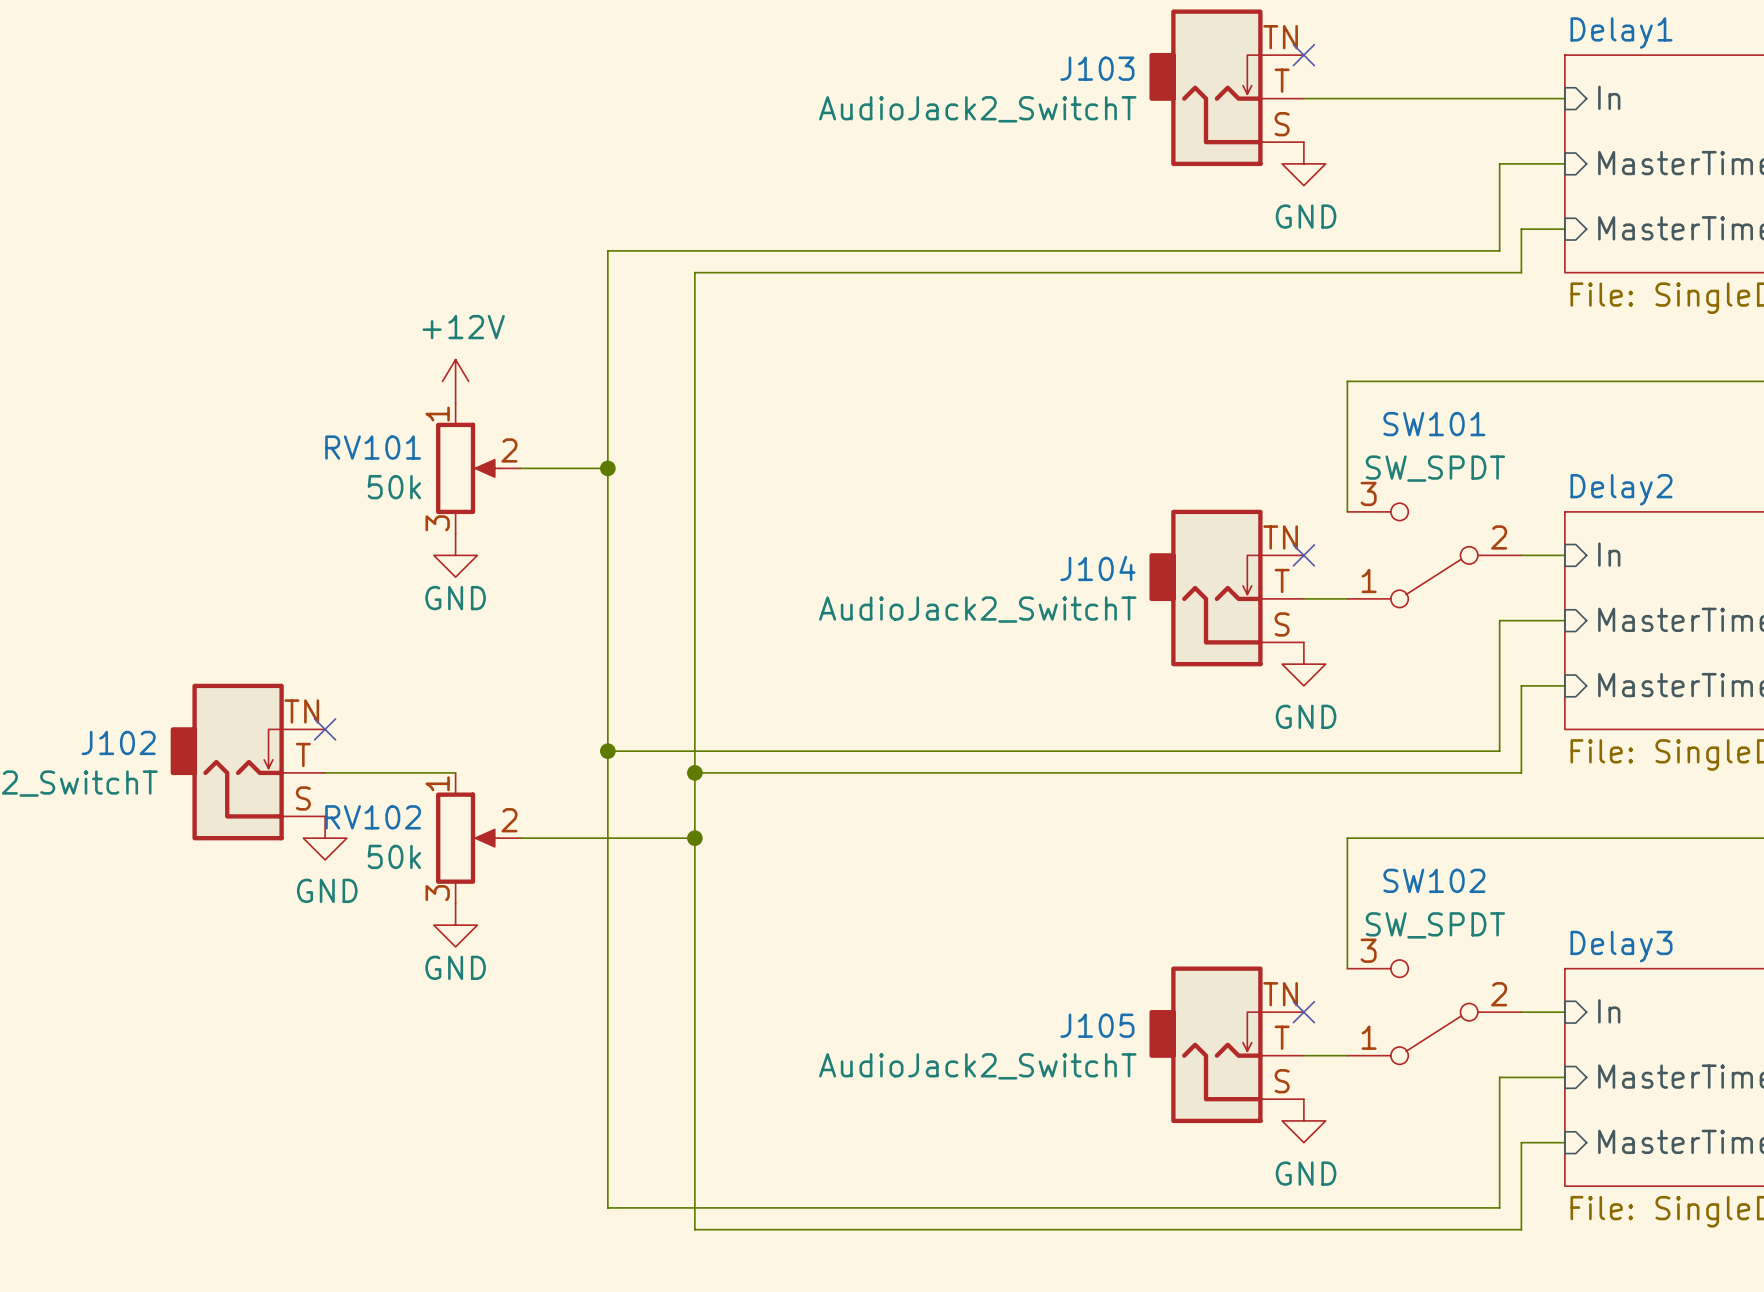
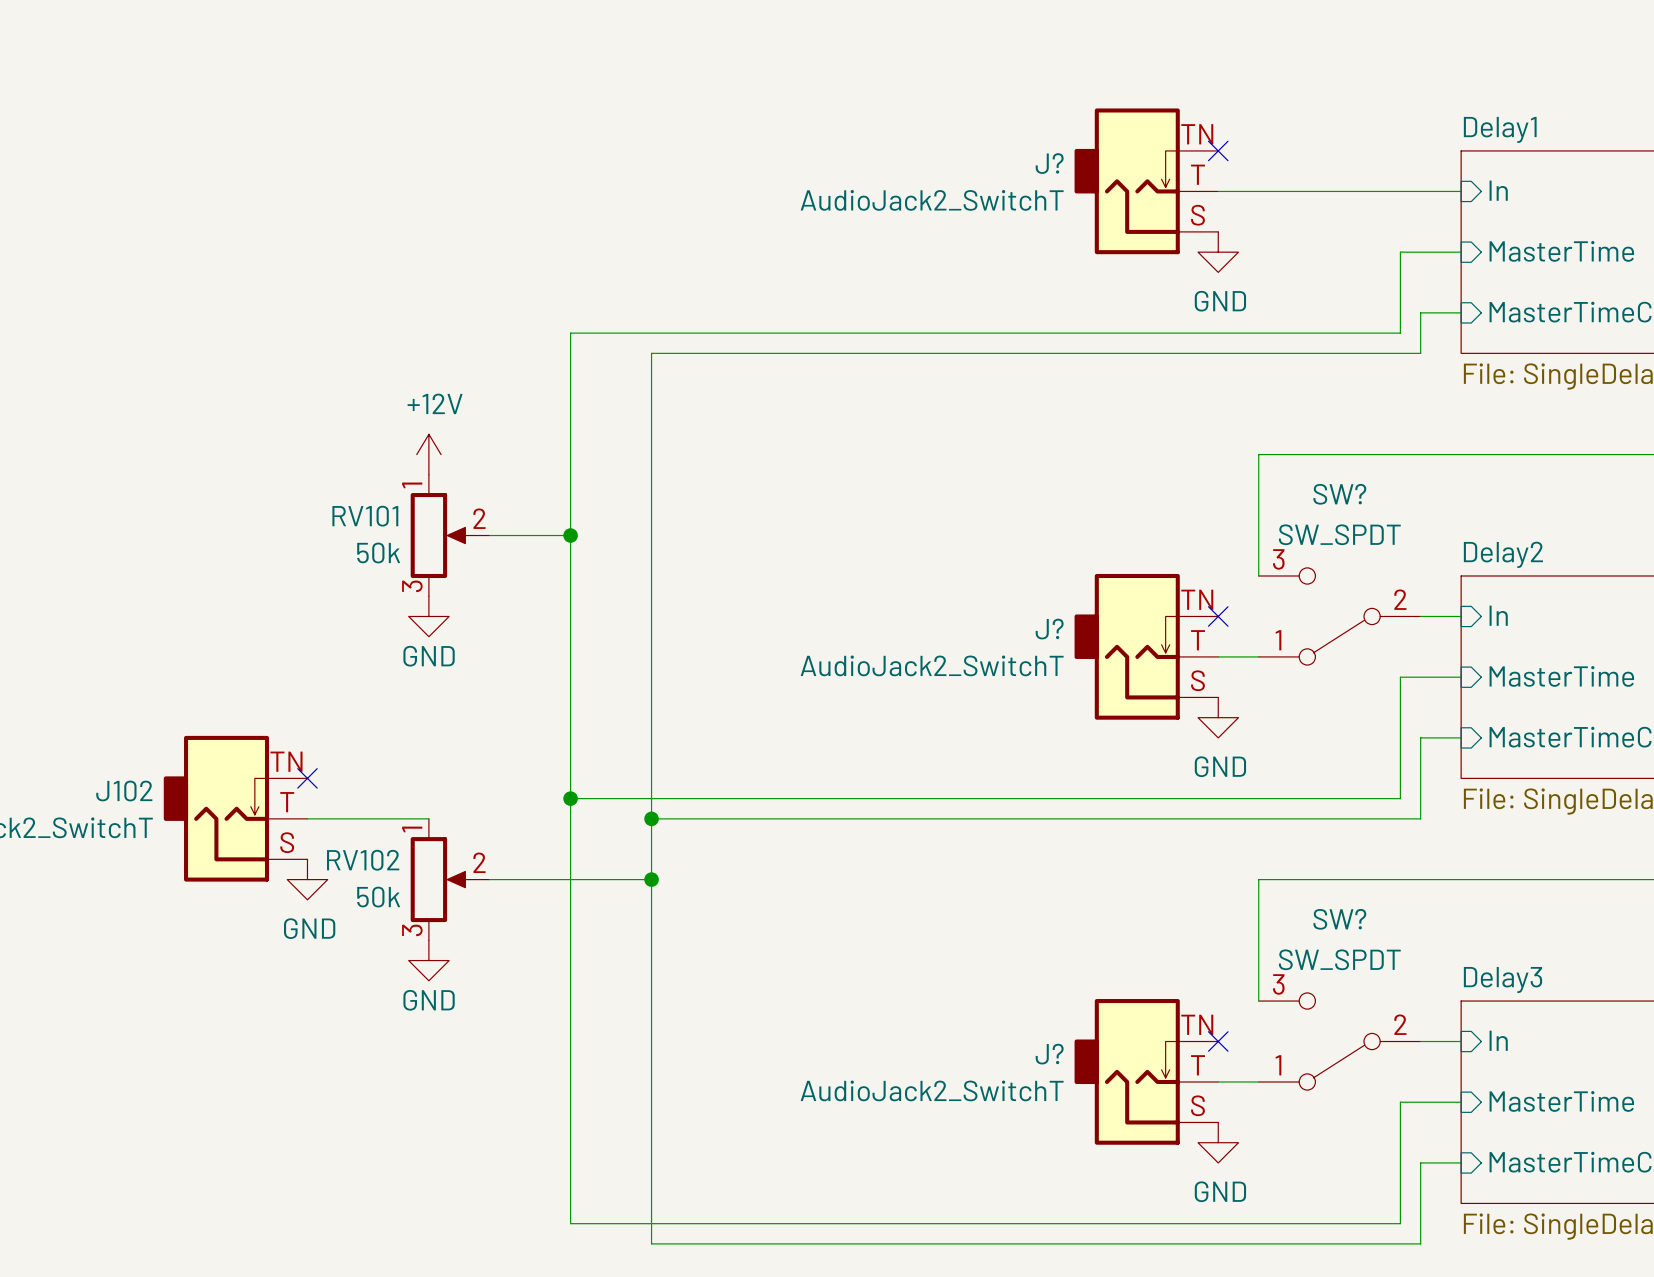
J103 name: J103 (1097, 68) -> J? (1049, 163)
SW101 name: SW101 (1434, 424) -> SW? (1339, 494)
J104 name: J104 (1097, 568) -> J? (1049, 629)
SW102 name: SW102 (1434, 880) -> SW? (1339, 919)
J105 name: J105 (1097, 1025) -> J? (1049, 1054)

